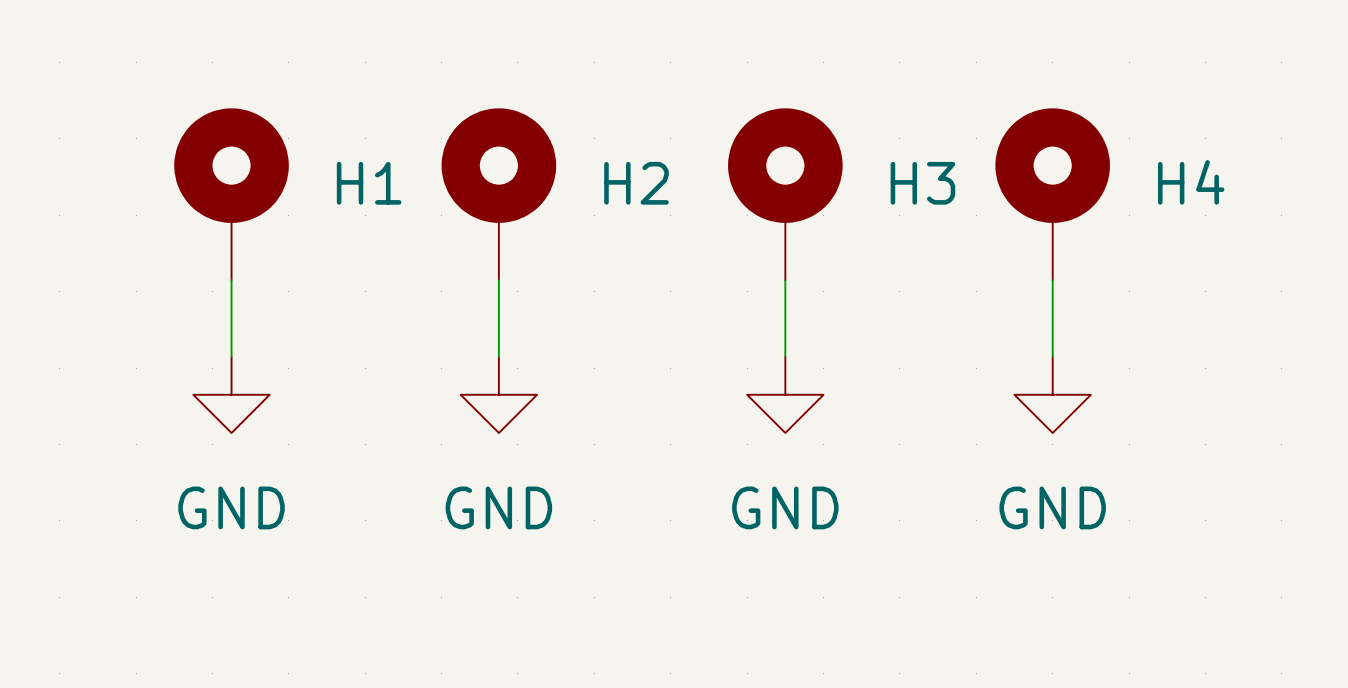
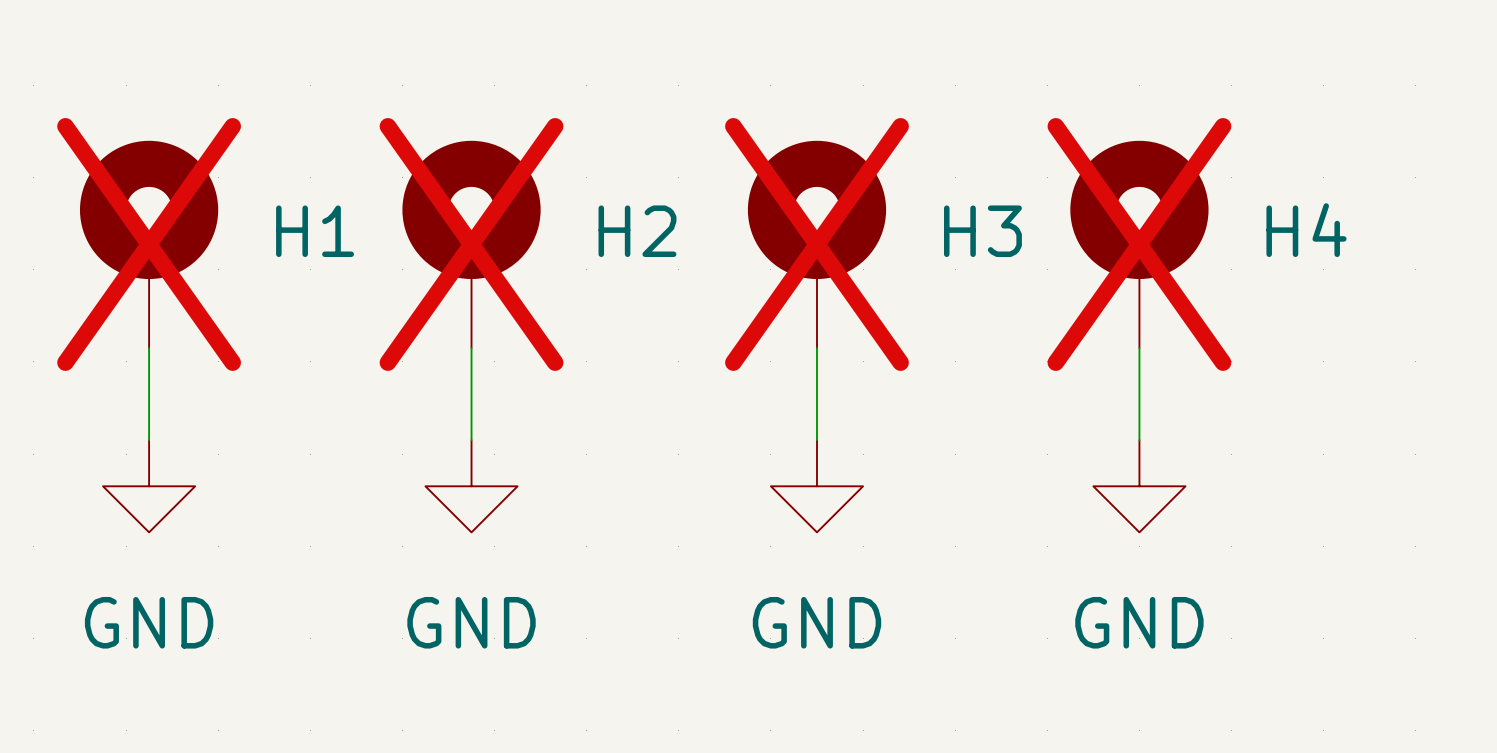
H1 do-not-place cross: none -> (149, 244)
H2 do-not-place cross: none -> (471, 244)
H3 do-not-place cross: none -> (816, 244)
H4 do-not-place cross: none -> (1139, 244)

